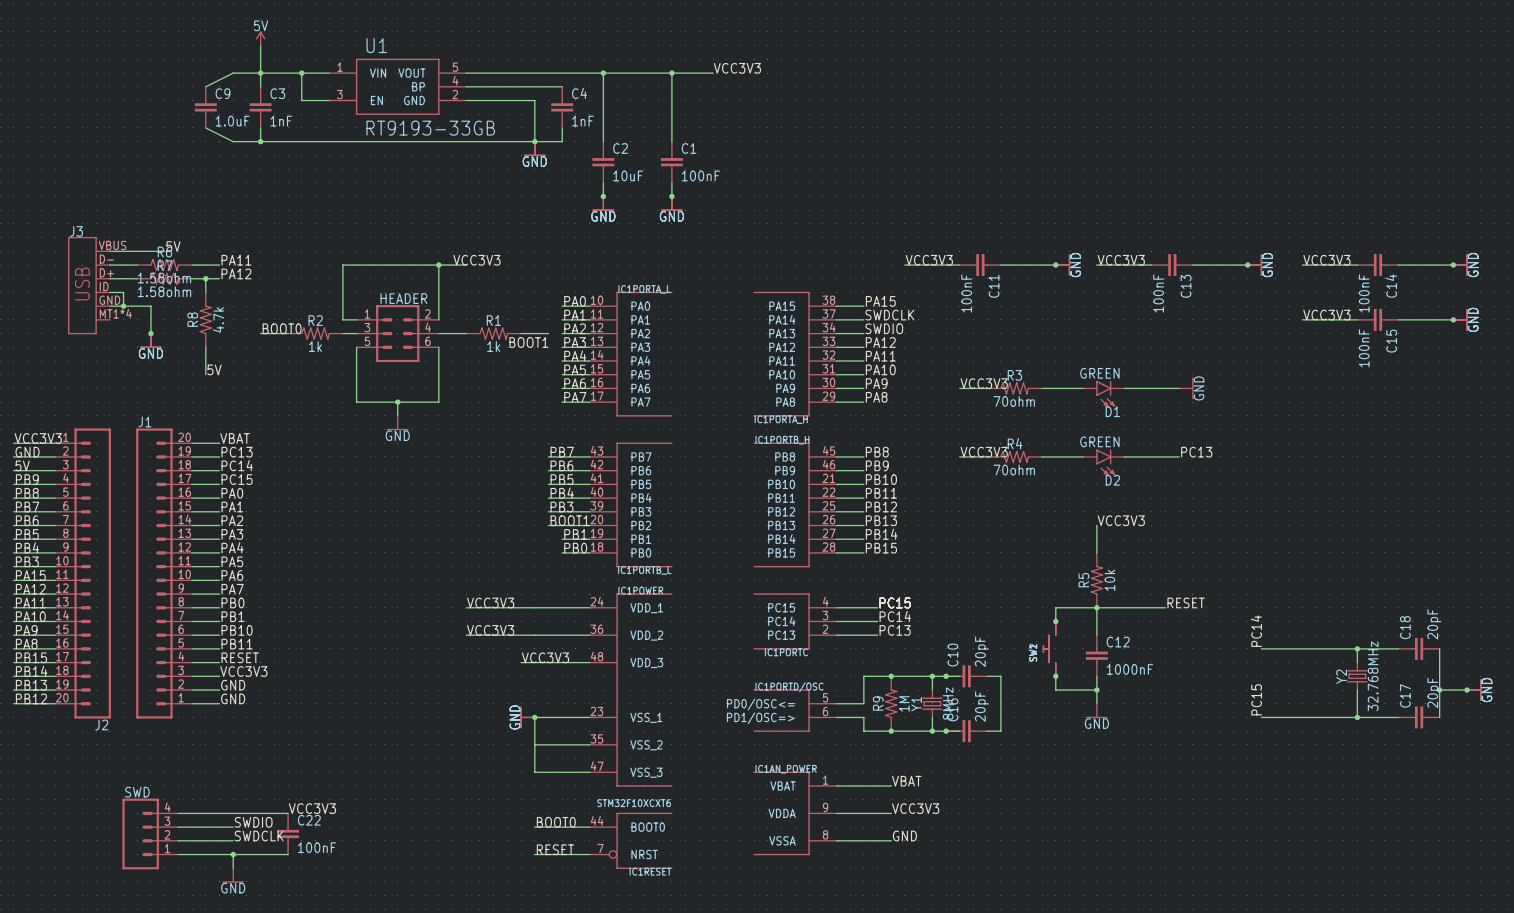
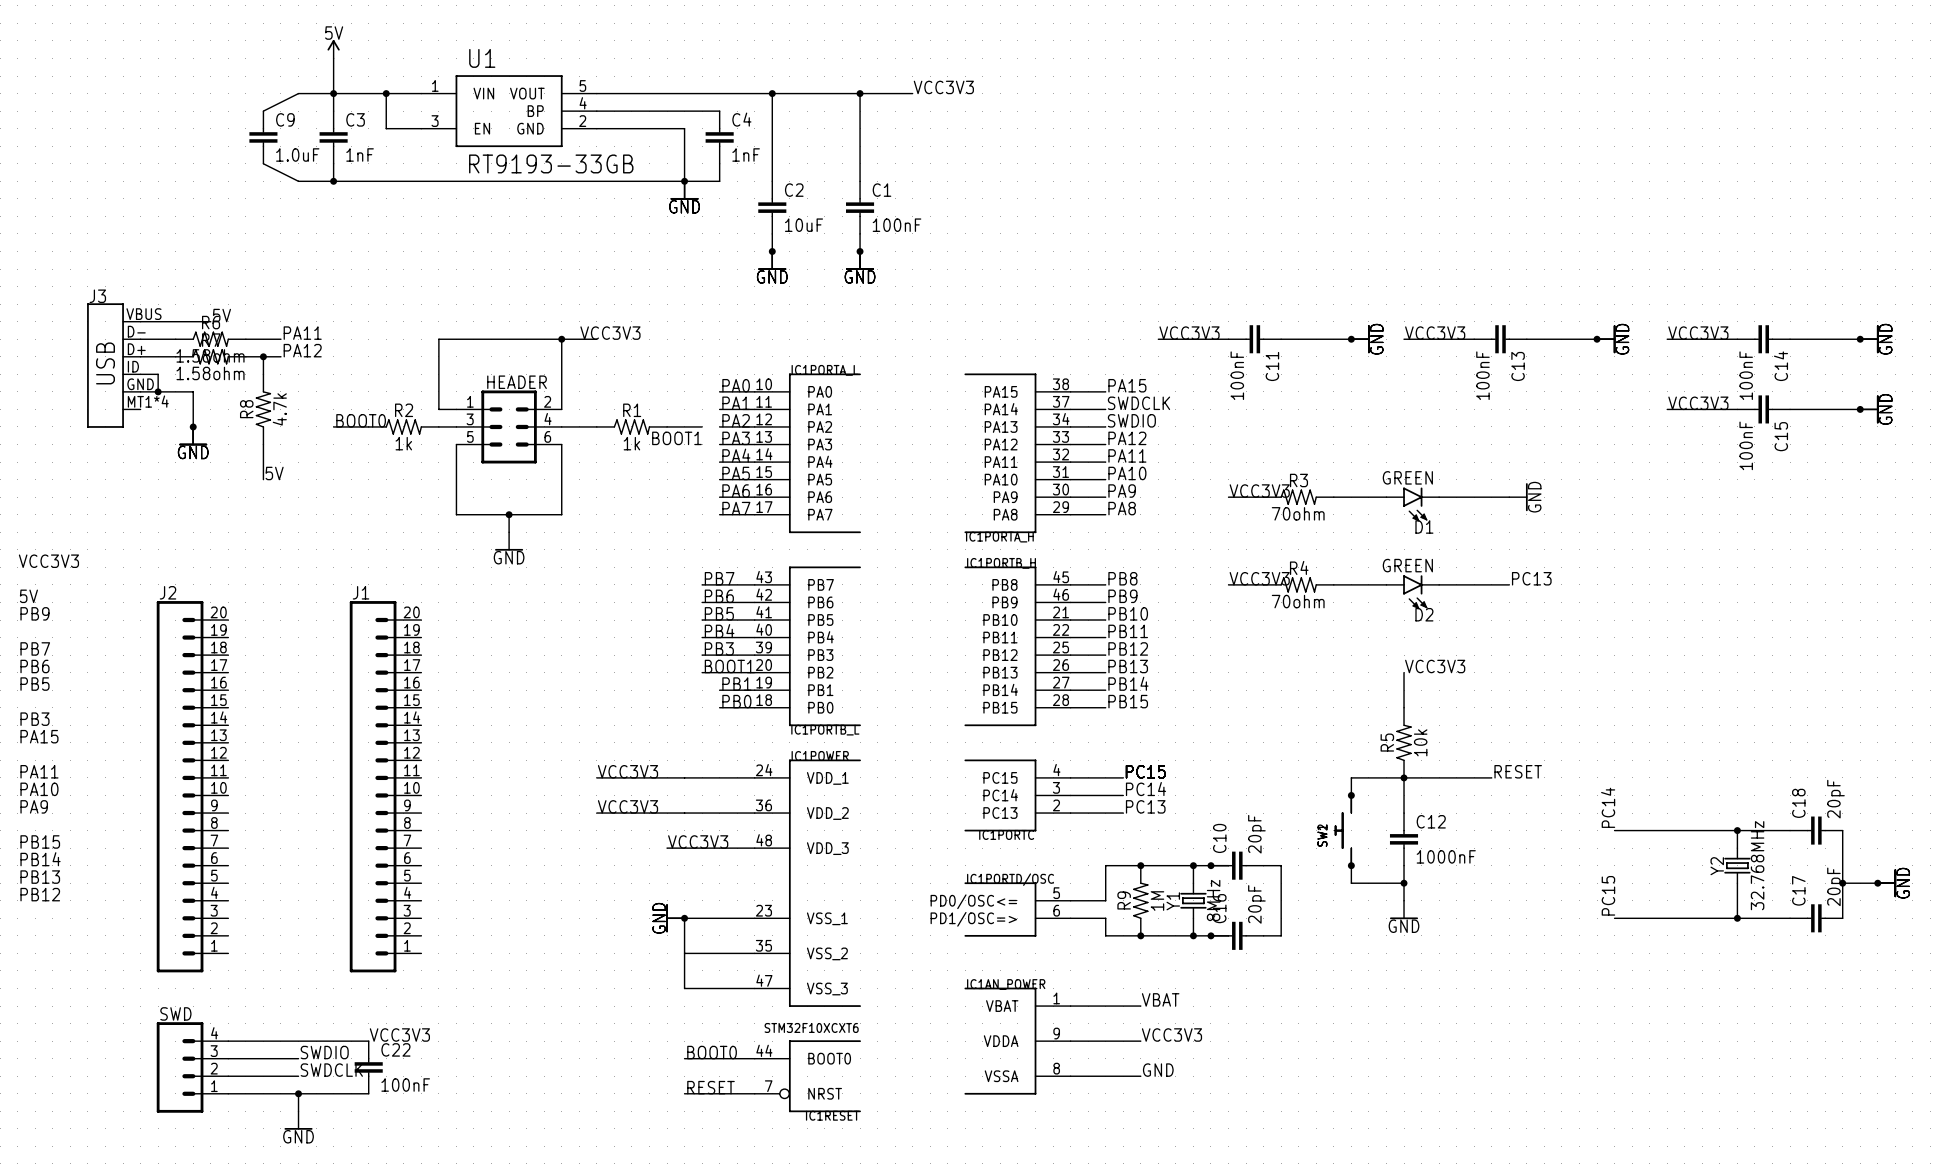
label: VBAT (235, 438) -> none
wire: (13, 443) (55, 443) -> none
wire: (192, 443) (219, 443) -> none
label: GND (27, 452) -> none
label: PC13 (237, 452) -> none
wire: (13, 456) (55, 456) -> none
wire: (192, 456) (219, 456) -> none
label: PC14 (237, 465) -> none
wire: (13, 470) (55, 470) -> none
wire: (192, 470) (219, 470) -> none
label: PC15 (237, 479) -> none
wire: (13, 484) (55, 484) -> none
wire: (192, 484) (219, 484) -> none
label: PB8 (27, 493) -> none
label: PA0 (232, 493) -> none
wire: (13, 498) (55, 498) -> none
wire: (192, 498) (219, 498) -> none
label: PA1 (232, 507) -> none
wire: (13, 511) (55, 511) -> none
wire: (192, 511) (219, 511) -> none
label: PA2 (232, 520) -> none
wire: (13, 525) (55, 525) -> none
wire: (192, 525) (219, 525) -> none
label: PA3 (232, 534) -> none
wire: (13, 539) (55, 539) -> none
wire: (192, 539) (219, 539) -> none
label: PB4 (27, 547) -> none
label: PA4 (232, 547) -> none
wire: (13, 552) (55, 552) -> none
wire: (192, 552) (219, 552) -> none
label: PA5 (232, 561) -> none
wire: (13, 566) (55, 566) -> none
wire: (192, 566) (219, 566) -> none
J2 rotation: 0° (92, 573) -> 180° (180, 786)
J1 position: (164, 573) -> (385, 786)
label: PA6 (232, 575) -> none
wire: (13, 580) (55, 580) -> none
wire: (192, 580) (219, 580) -> none
label: PA12 (30, 589) -> none
label: PA7 (232, 589) -> none
wire: (13, 594) (55, 594) -> none
wire: (192, 594) (219, 594) -> none
label: PB0 (232, 602) -> none
wire: (13, 607) (55, 607) -> none
wire: (192, 607) (219, 607) -> none
label: PB1 (232, 616) -> none
wire: (13, 621) (55, 621) -> none
wire: (192, 621) (219, 621) -> none
label: PB10 (237, 630) -> none
wire: (13, 635) (55, 635) -> none
wire: (192, 635) (219, 635) -> none
label: PA8 (26, 644) -> none
label: PB11 (237, 644) -> none
wire: (13, 648) (55, 648) -> none
wire: (192, 648) (219, 648) -> none
label: RESET (240, 657) -> none
wire: (13, 662) (55, 662) -> none
wire: (192, 662) (219, 662) -> none
label: VCC3V3 (243, 671) -> none
wire: (13, 676) (55, 676) -> none
wire: (192, 676) (219, 676) -> none
label: GND (233, 685) -> none
wire: (13, 690) (55, 690) -> none
wire: (192, 690) (219, 690) -> none
label: GND (233, 698) -> none
wire: (13, 703) (55, 703) -> none
wire: (192, 703) (219, 703) -> none

